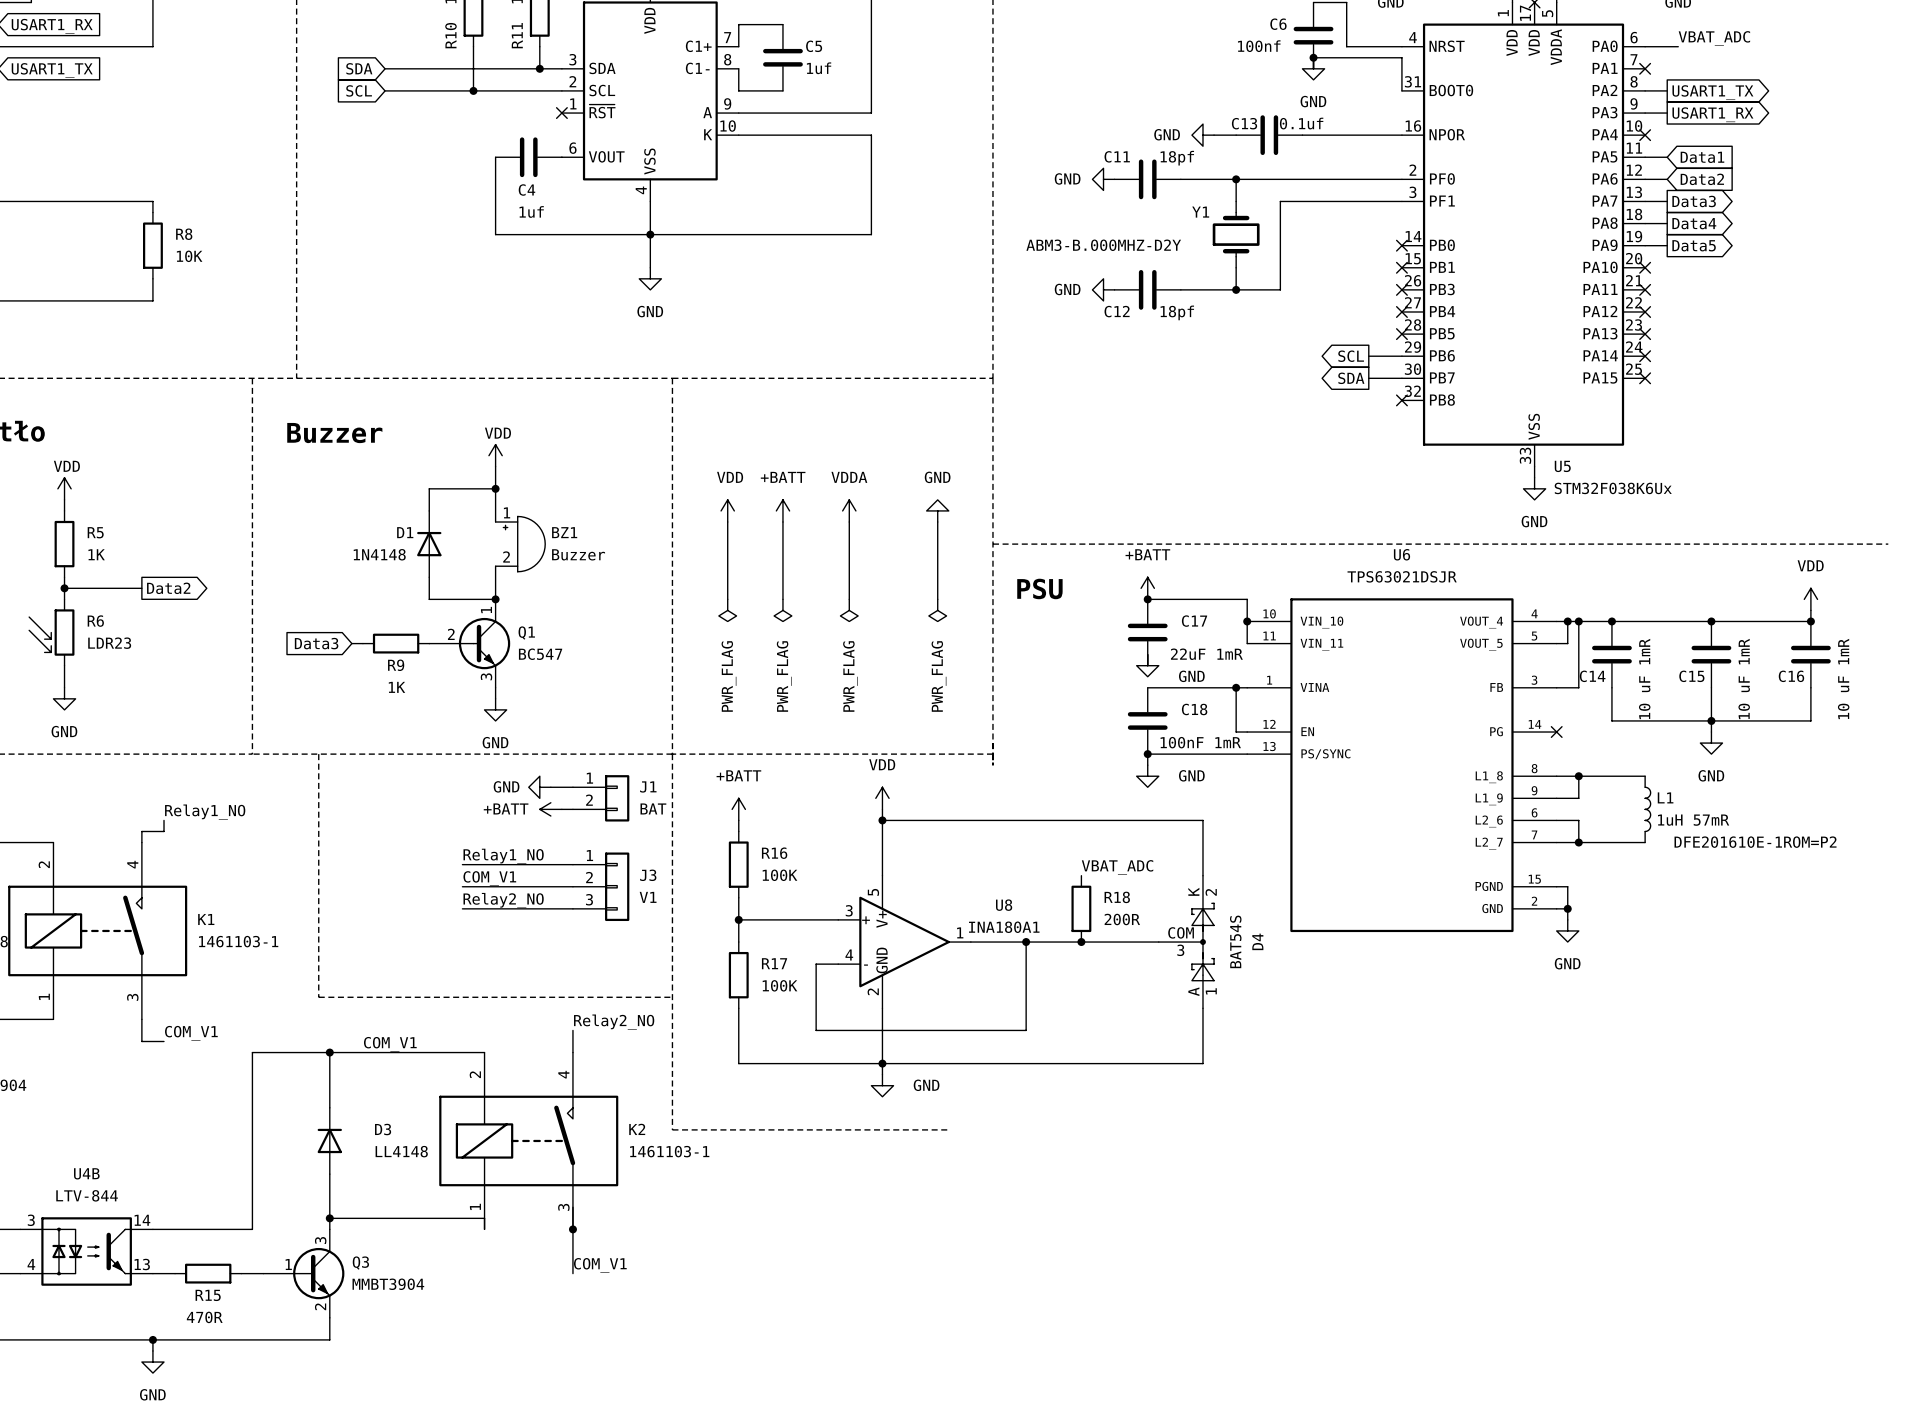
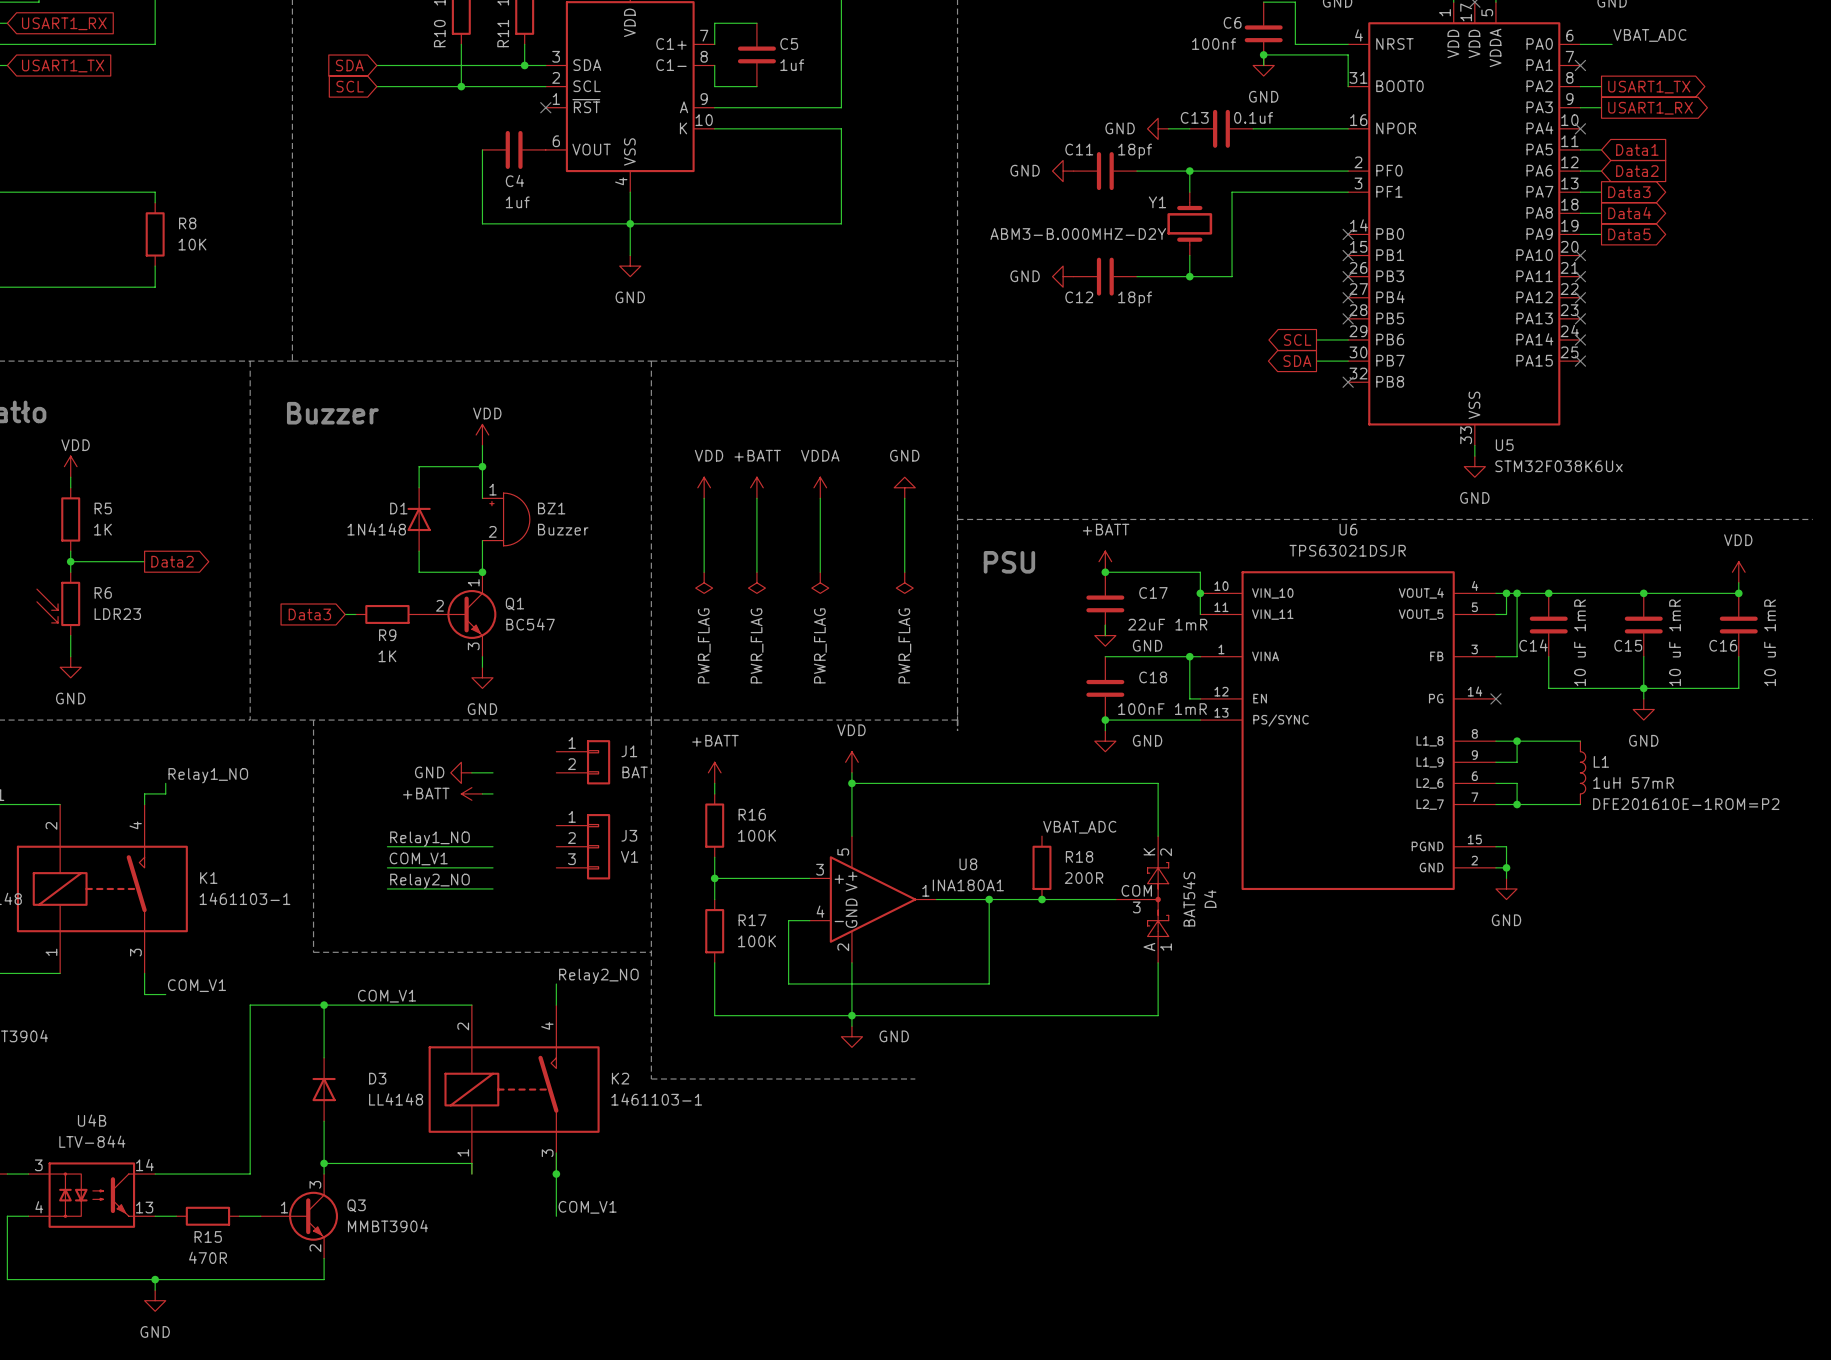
power symbol position: GND (539, 787) -> GND (461, 772)
wire: (550, 787) (572, 787) -> (471, 772) (493, 772)
power symbol position: +BATT (550, 809) -> +BATT (471, 793)
wire: (561, 809) (572, 809) -> (482, 793) (493, 793)
label position: Relay1_NO (503, 856) -> Relay1_NO (429, 839)
wire: (462, 864) (572, 864) -> (387, 888) (493, 888)
label position: COM_V1 (489, 878) -> COM_V1 (418, 858)
wire: (506, 886) (572, 886) -> (387, 846) (450, 846)
label position: Relay2_NO (503, 900) -> Relay2_NO (429, 881)
wire: (506, 908) (572, 908) -> (387, 867) (450, 867)

